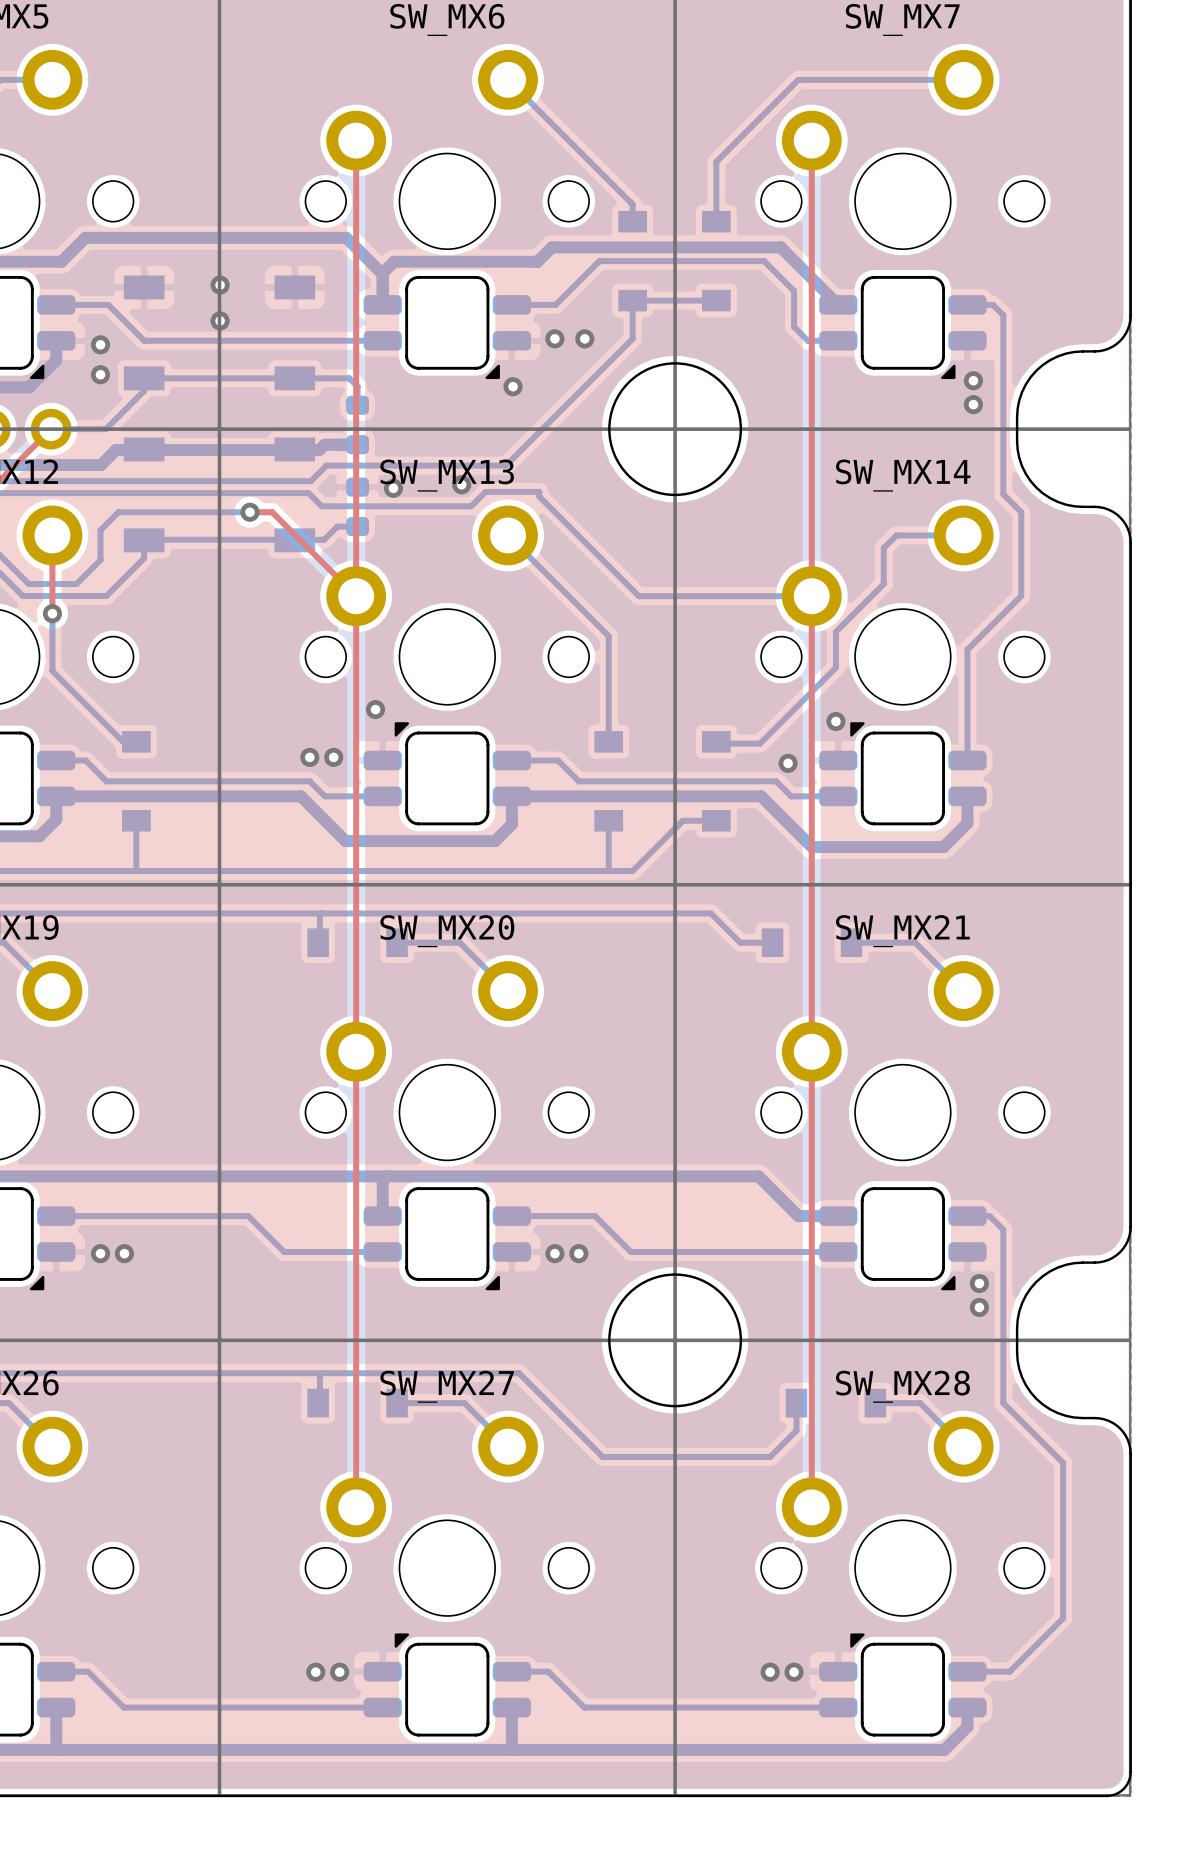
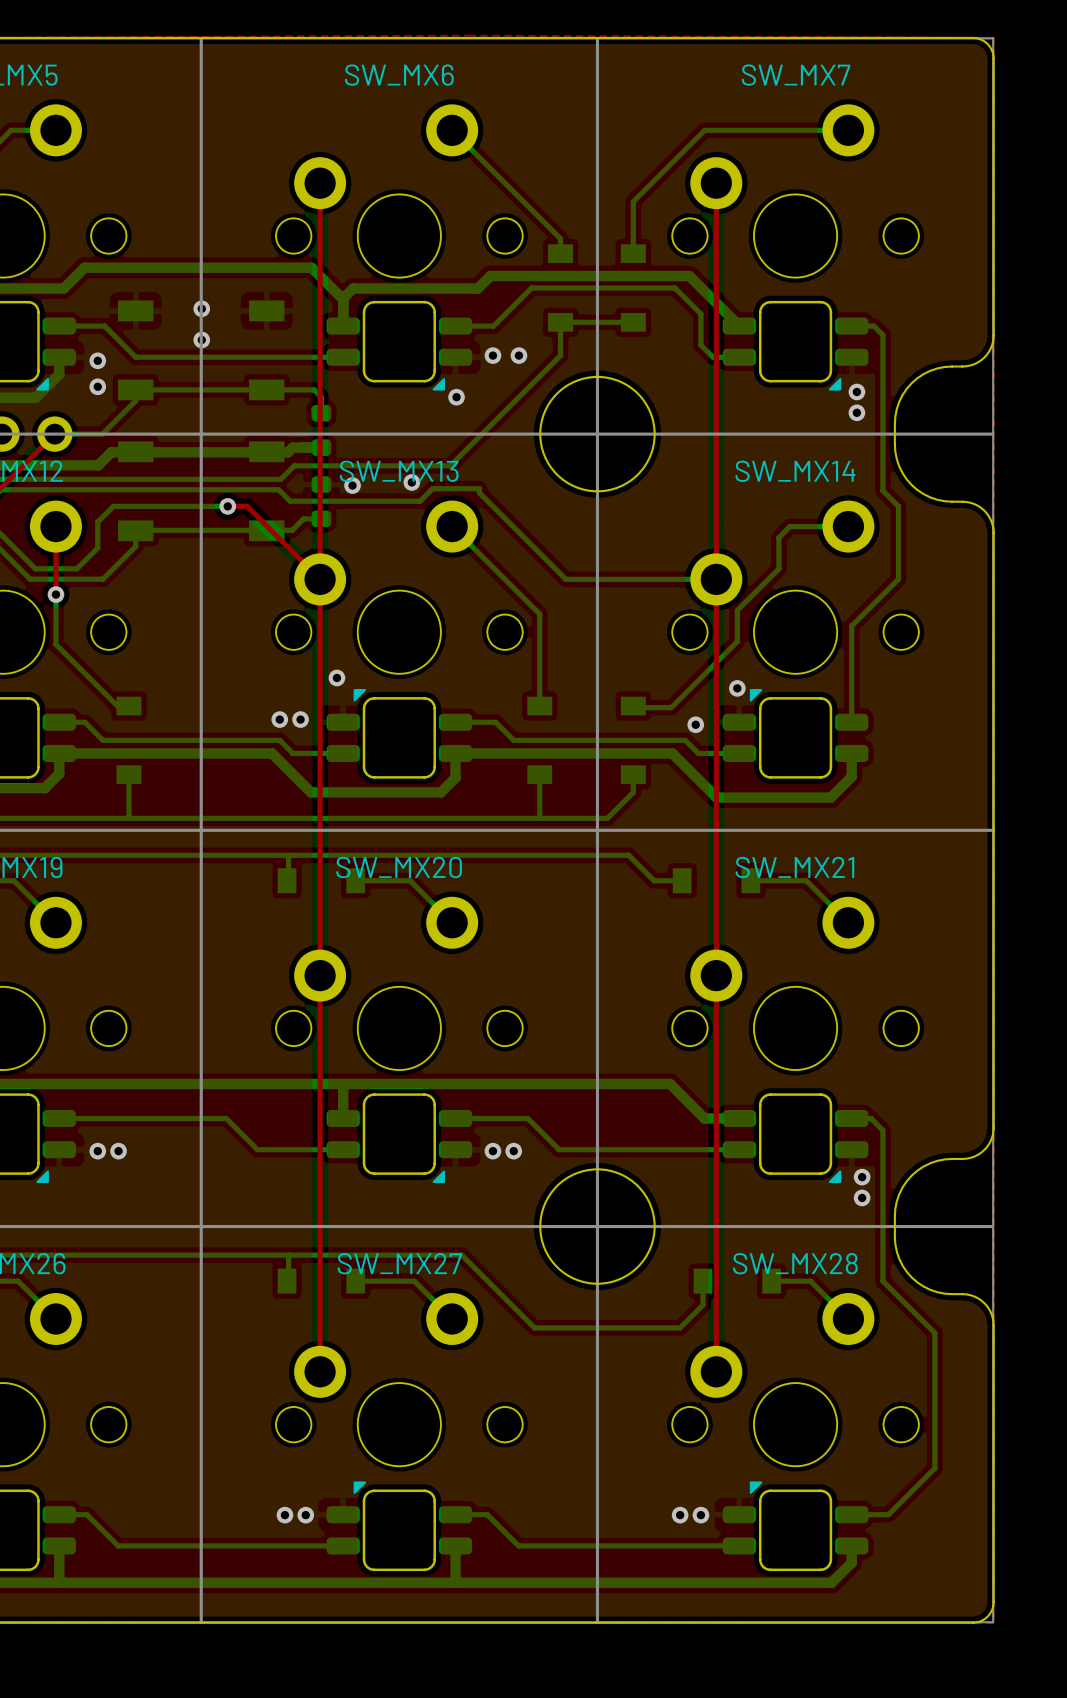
bottom track: (716, 820) (682, 820) (632, 870) -> (633, 773) (633, 792) (607, 818) (560, 818)

